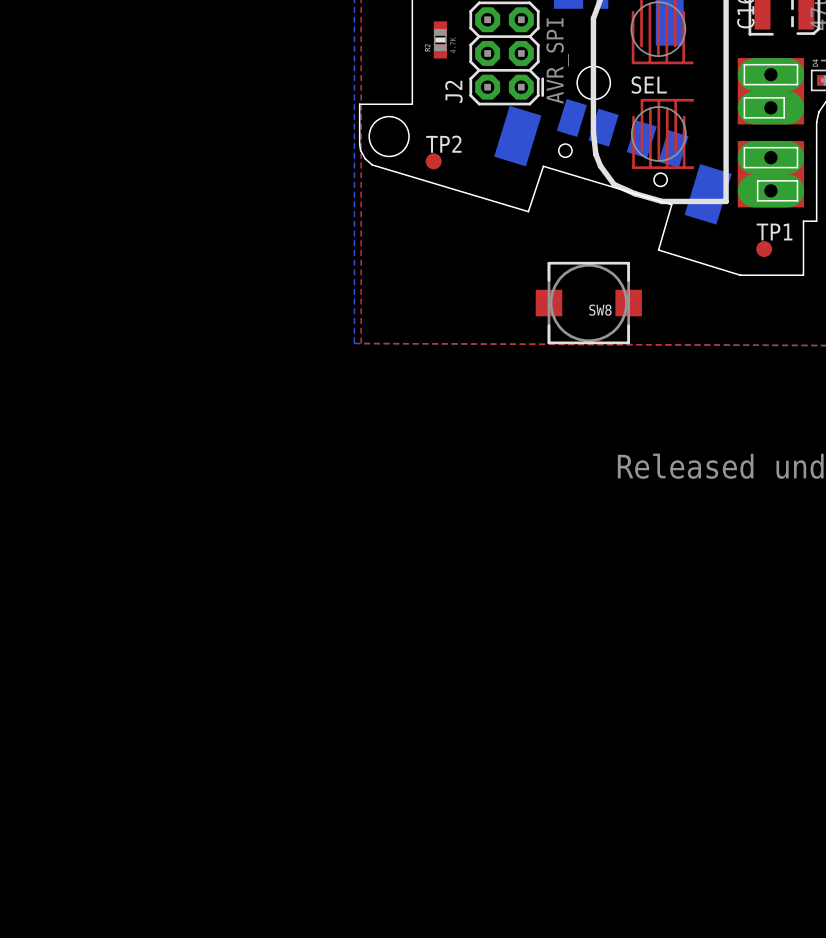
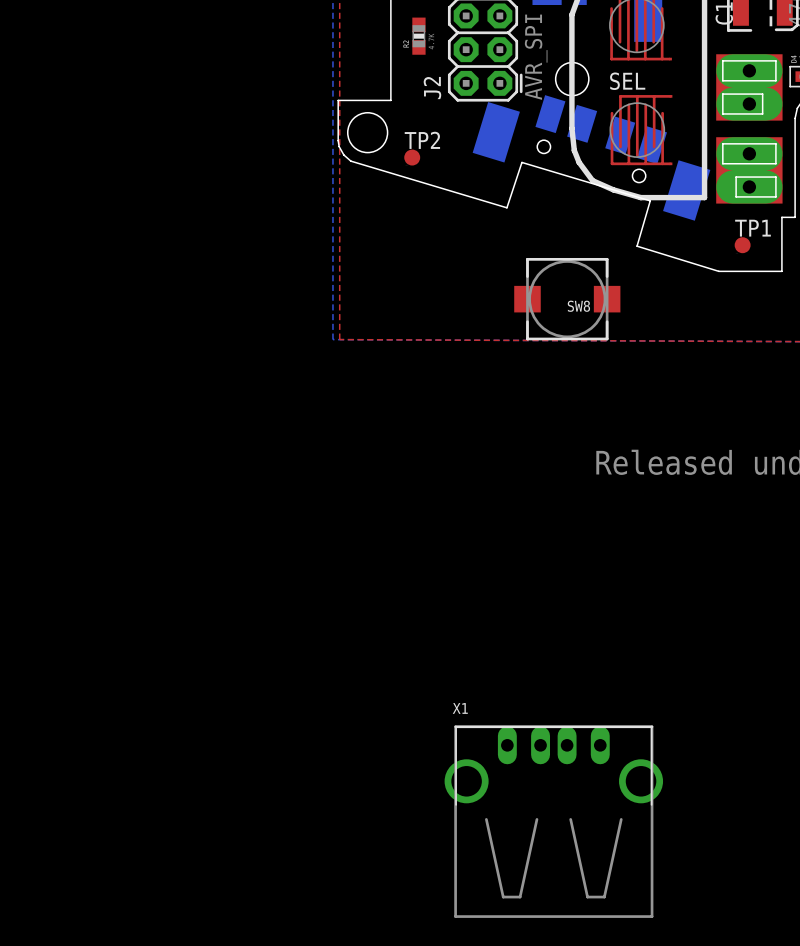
X1: none -> (553, 821)

